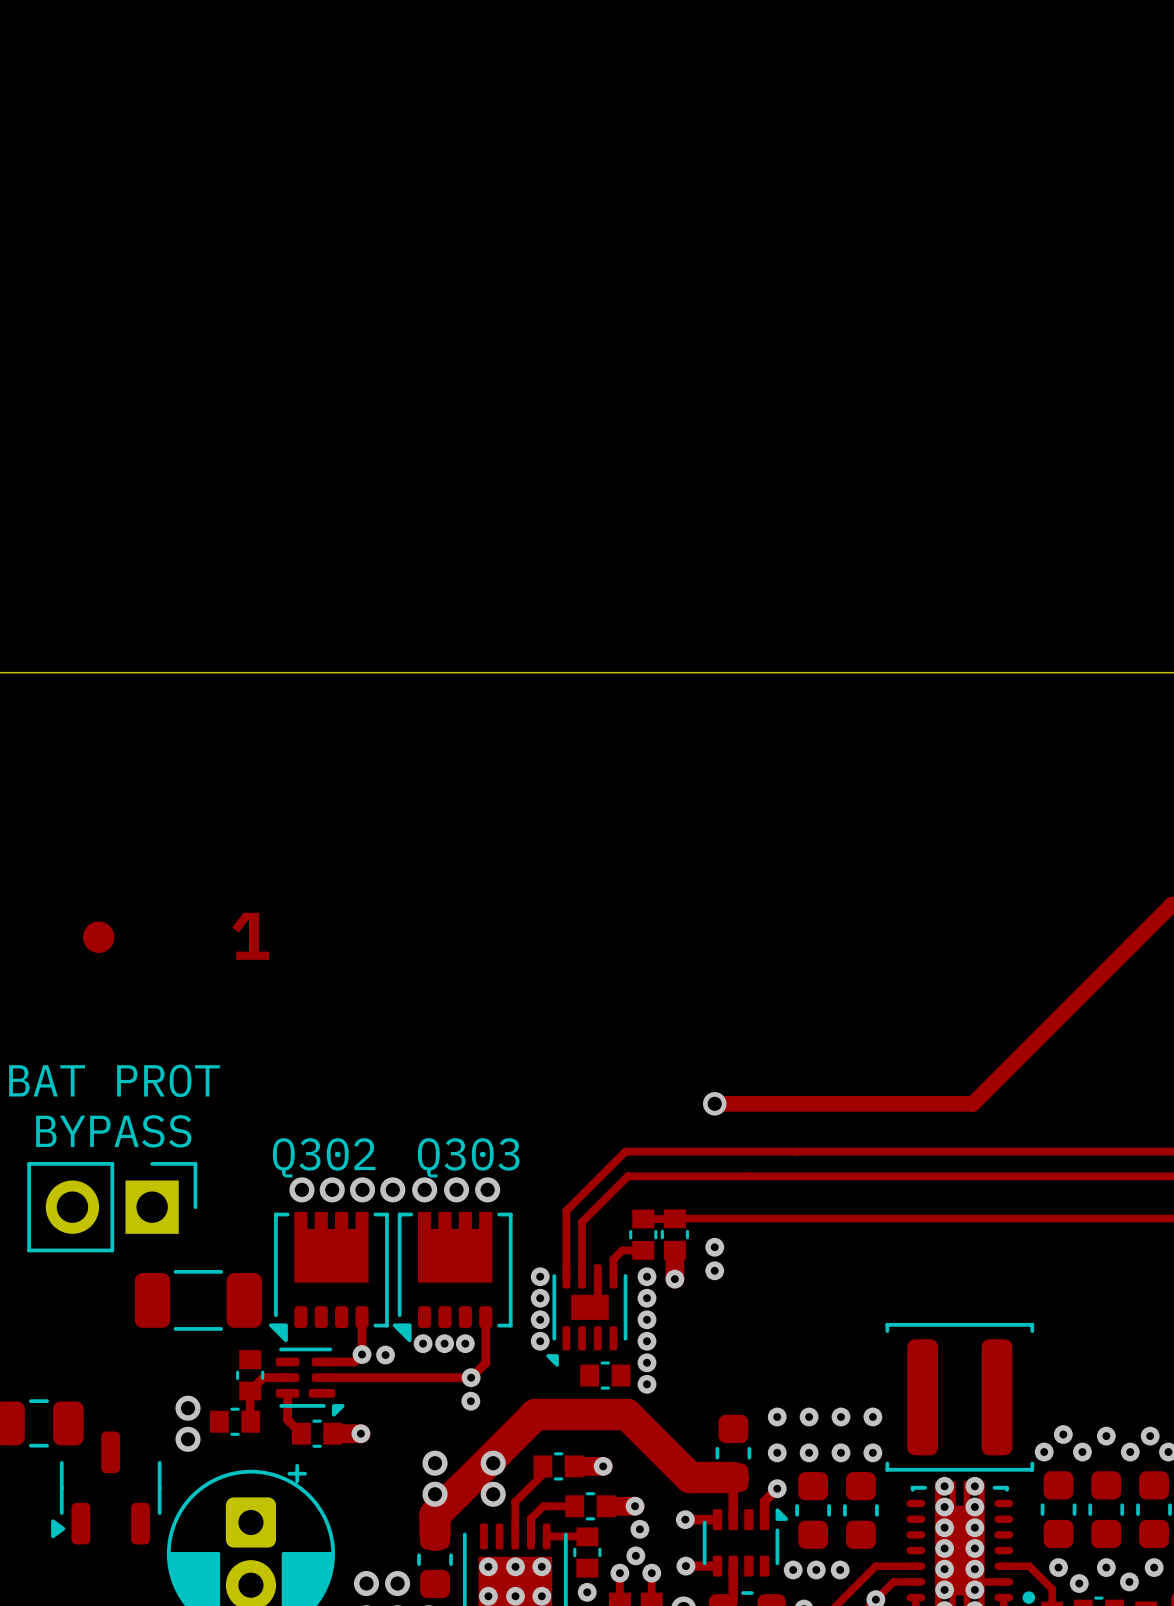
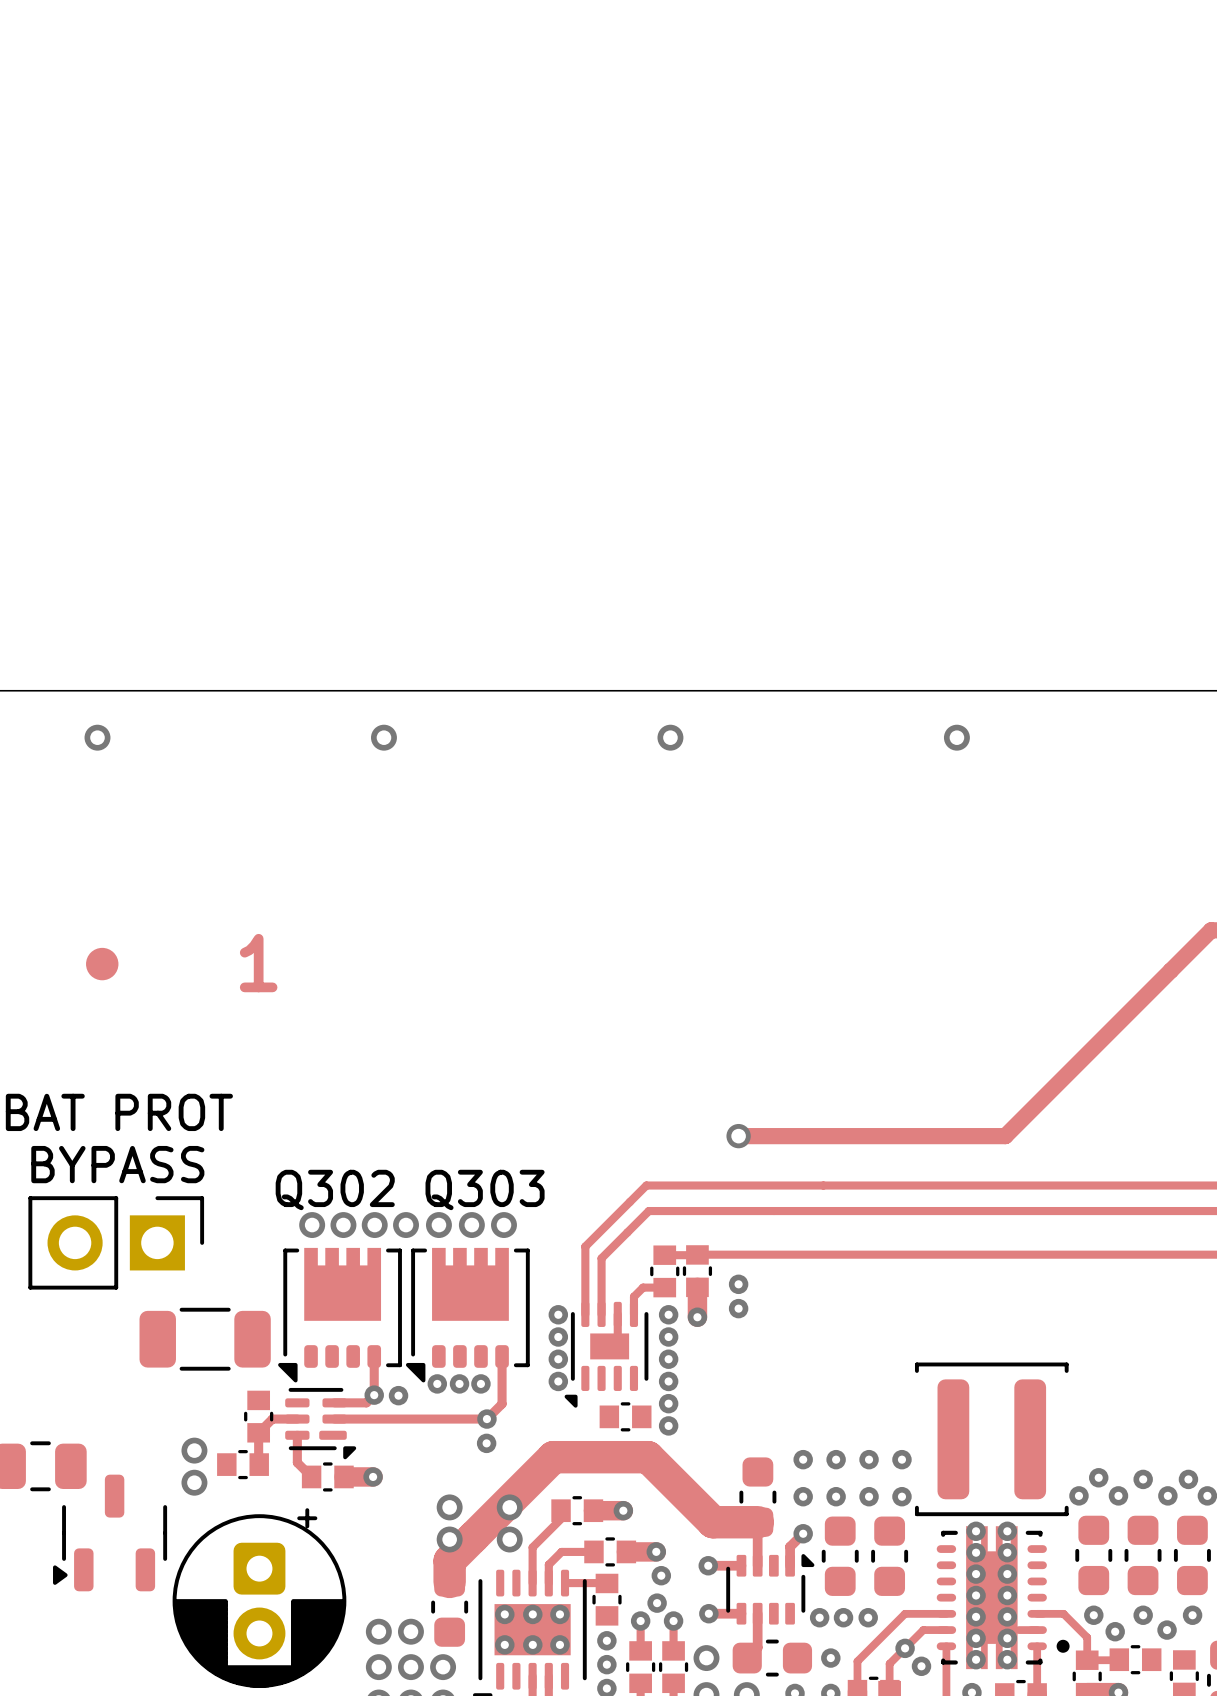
via: none -> (97, 737)
via: none -> (383, 737)
via: none -> (670, 737)
via: none -> (956, 737)

